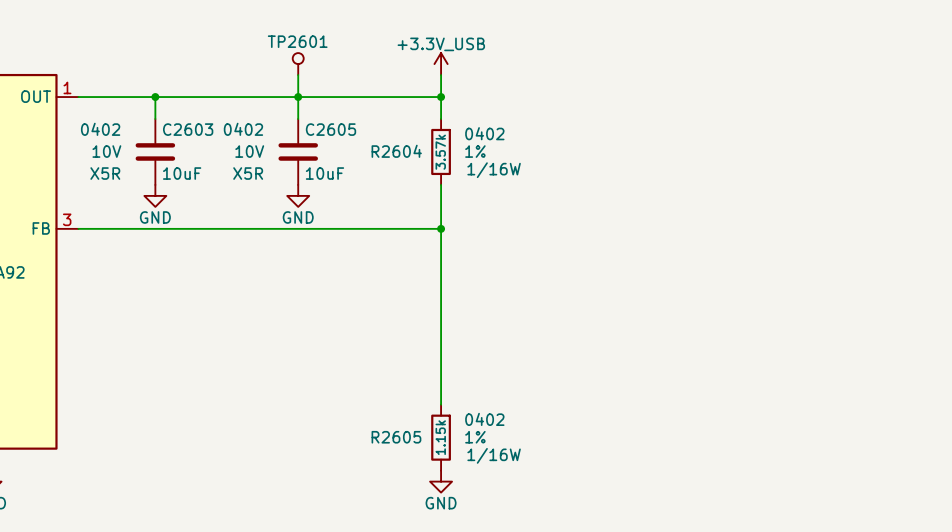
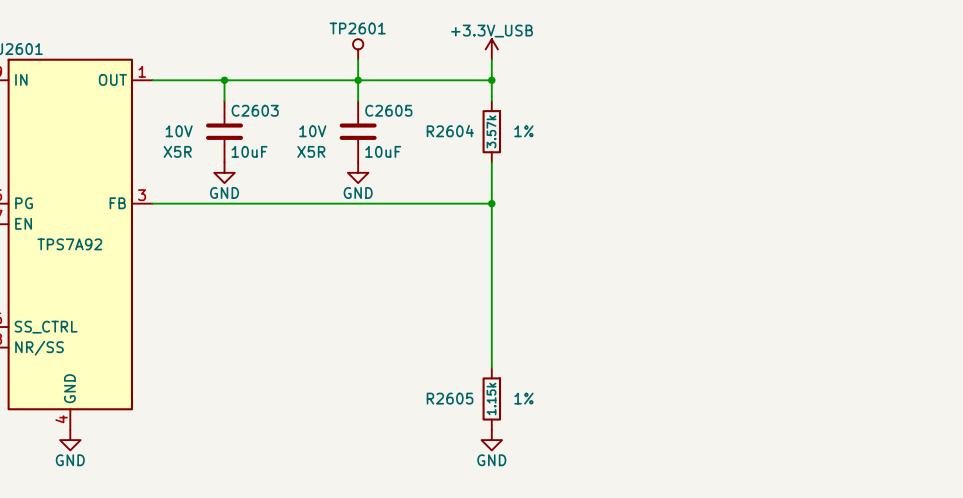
C2603 text: 0402 (100, 129) -> none
C2605 text: 0402 (243, 129) -> none
R2604 text: 0402 (484, 133) -> none
R2604 text: 1/16W (494, 170) -> none
R2605 text: 0402 (484, 419) -> none
R2605 text: 1/16W (494, 455) -> none

